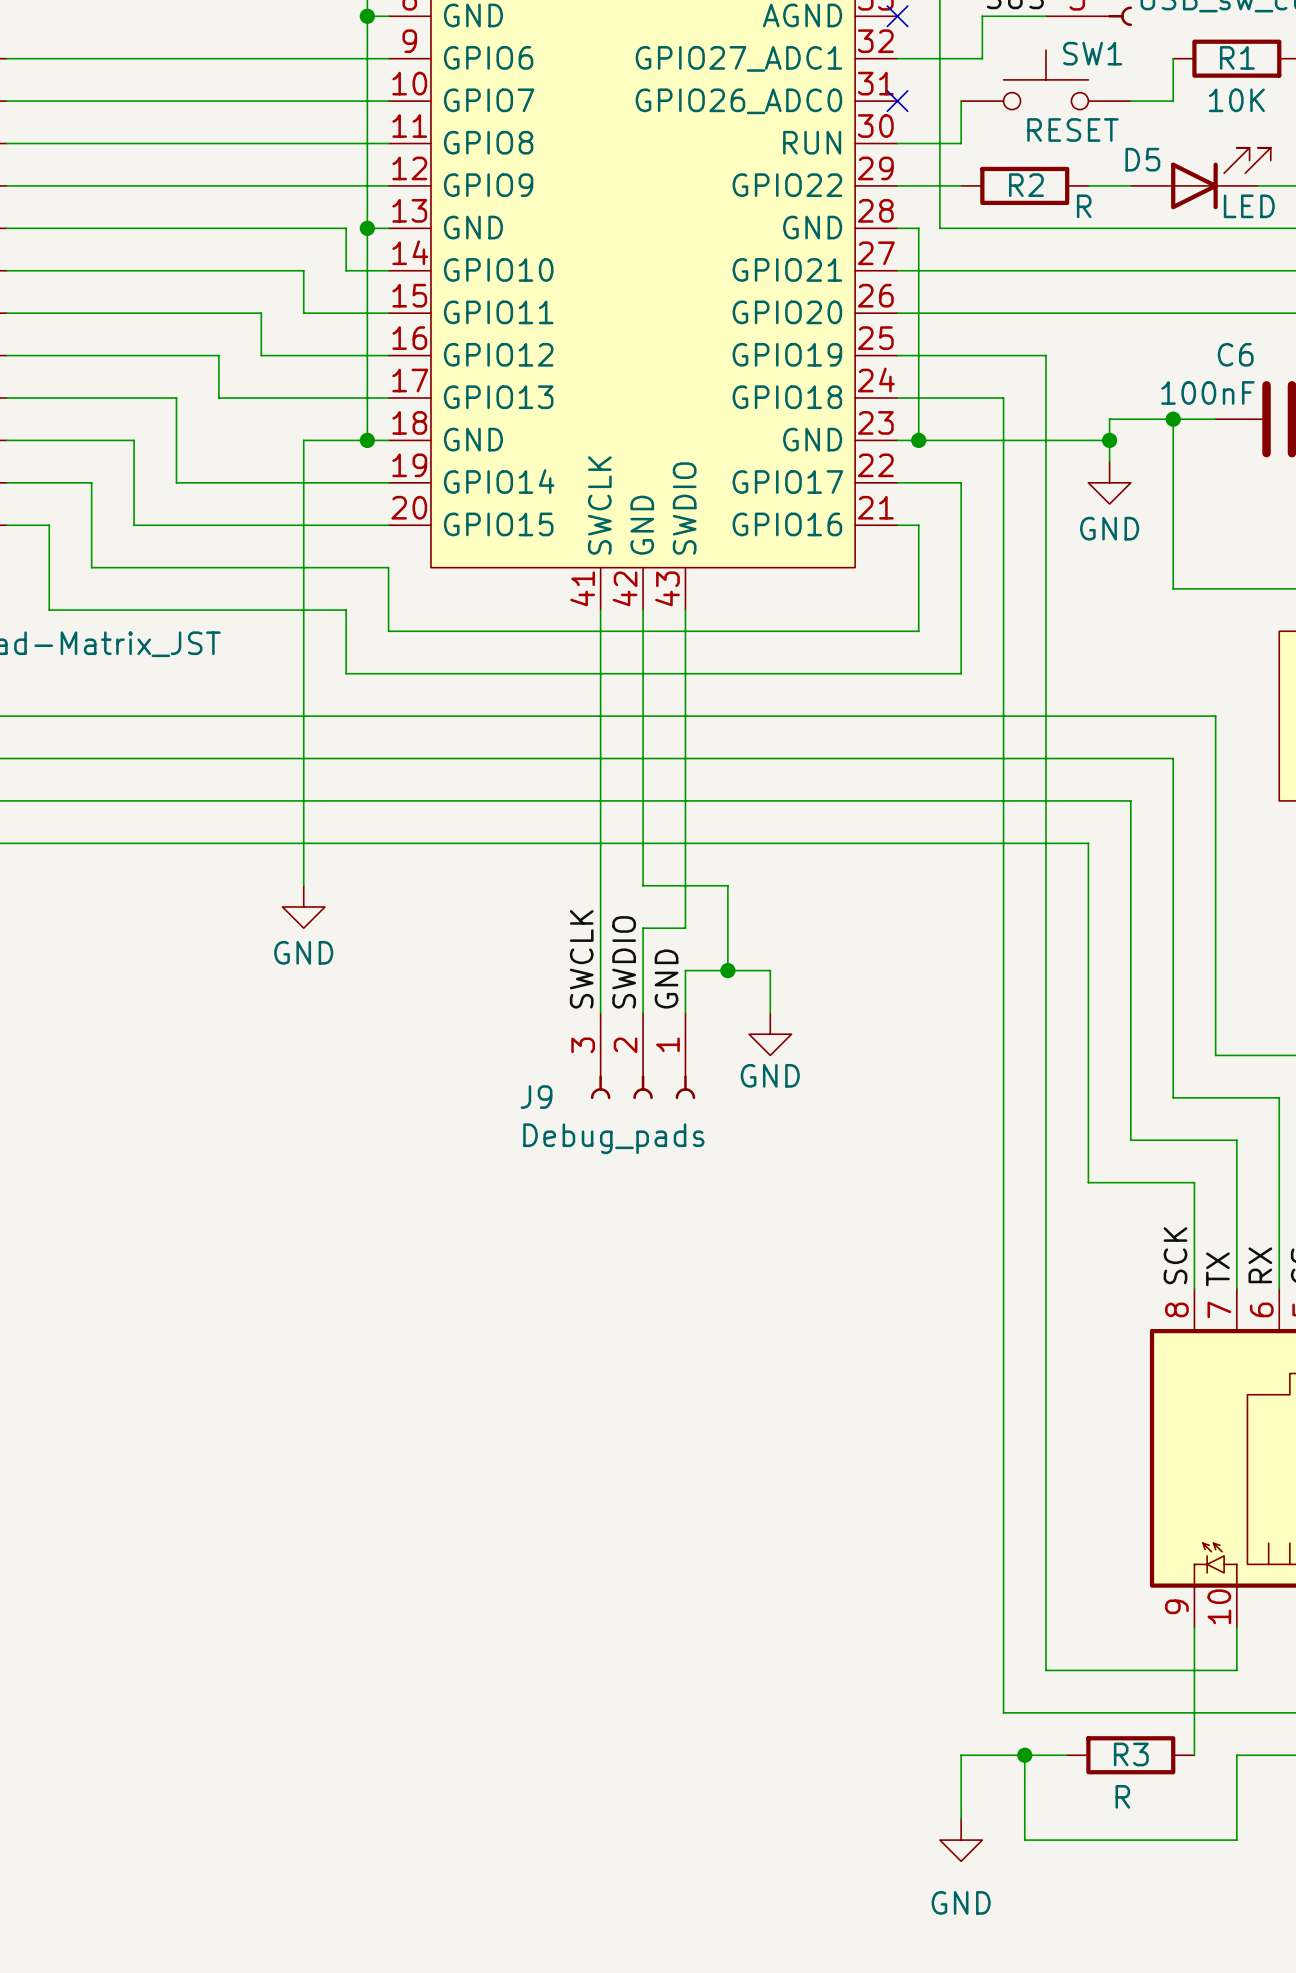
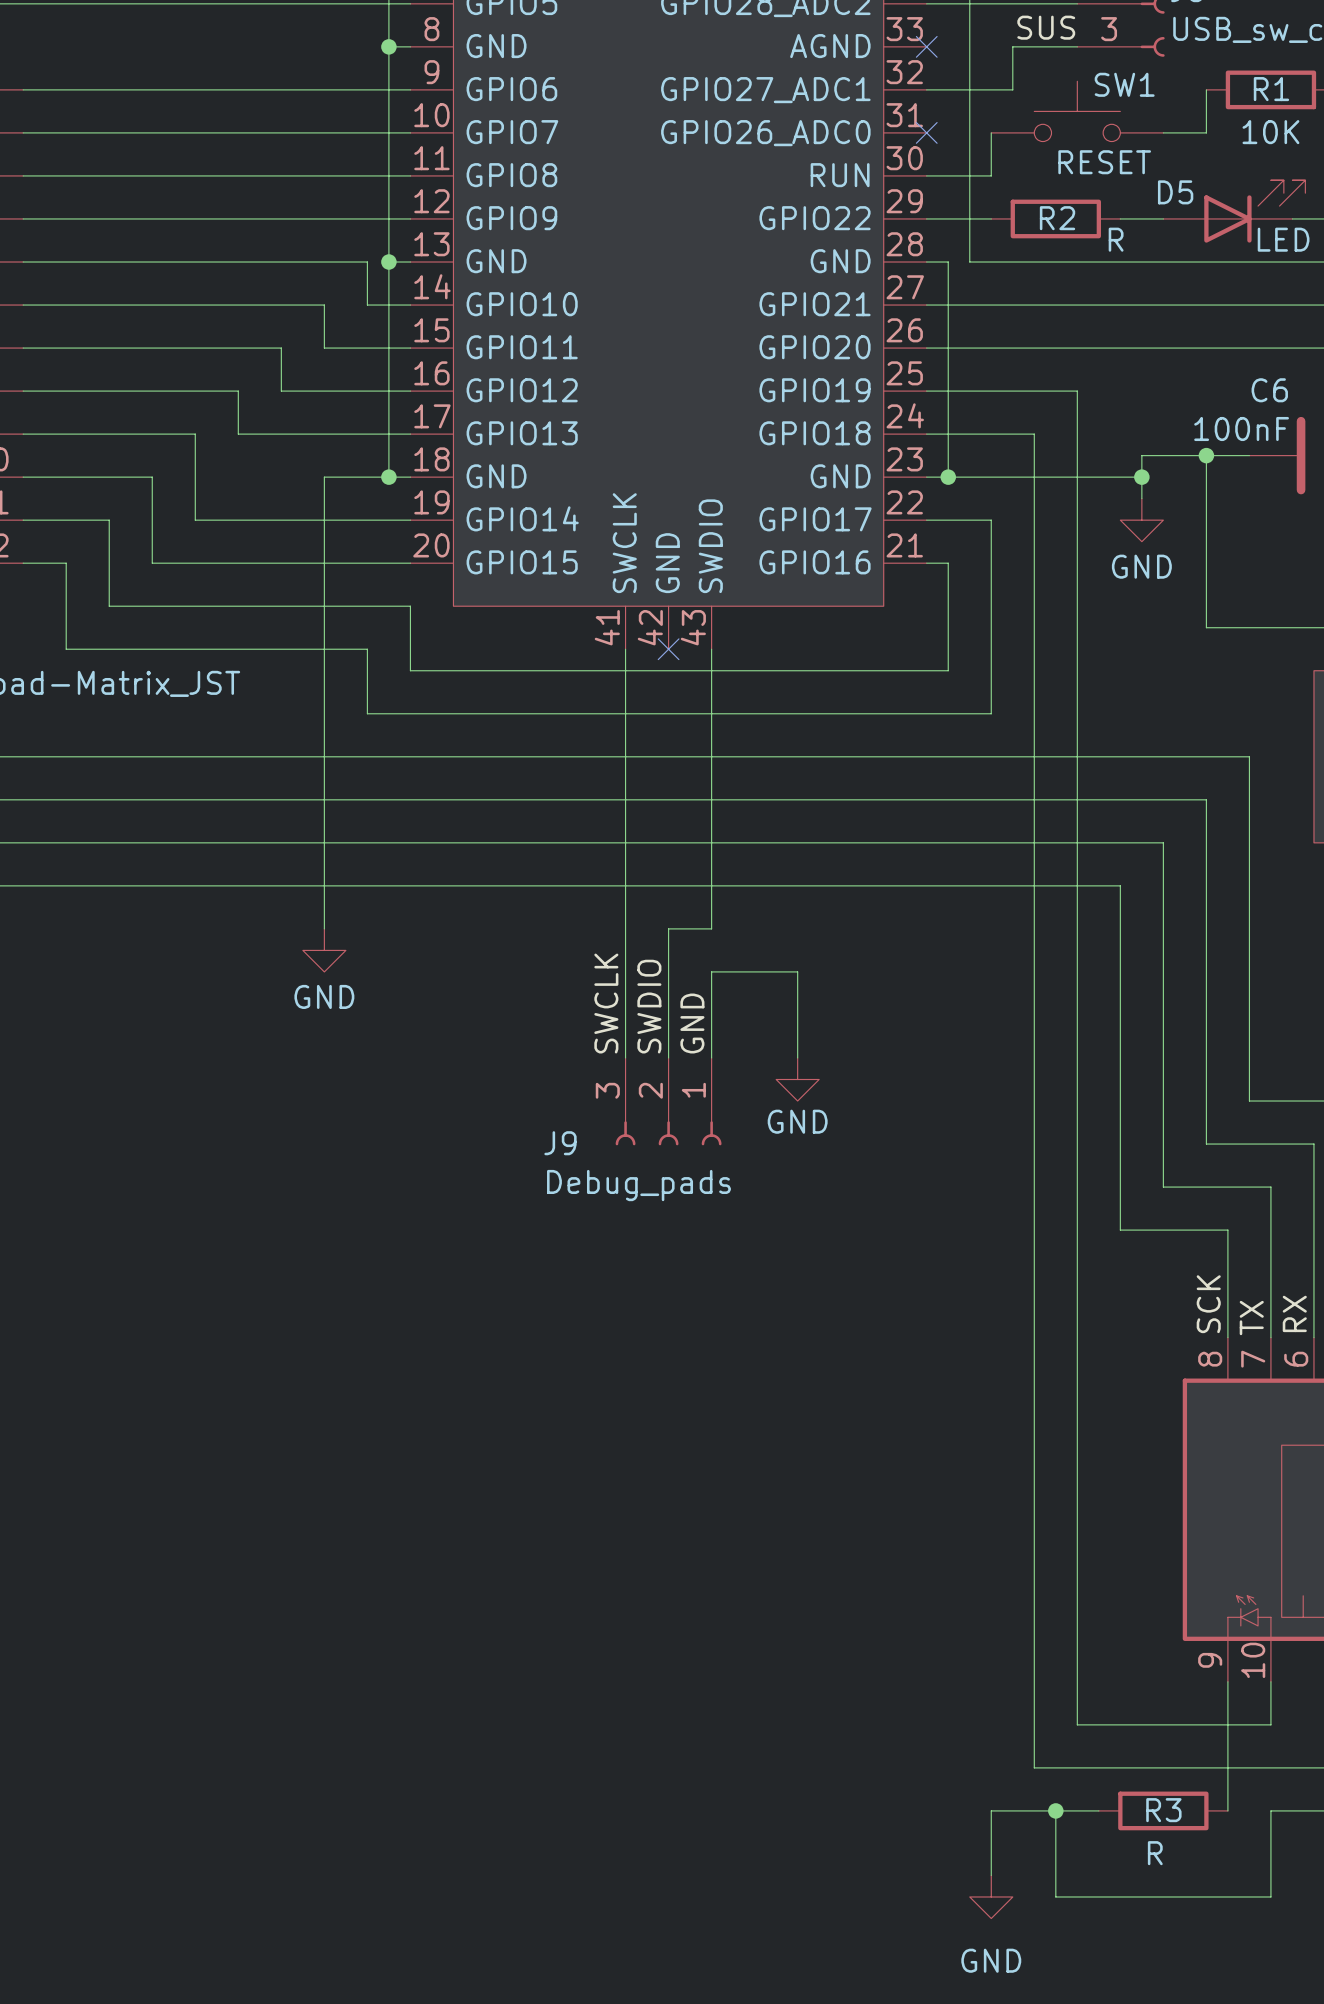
wire: (643, 610) (643, 885) -> none
no-connect mark: none -> (668, 649)
wire: (643, 928) (685, 928) (685, 885) (727, 885) (727, 970) -> (668, 971) (668, 928)
wire: (685, 970) (770, 970) -> (711, 1014) (711, 971) (797, 971) (797, 1014)
junction: (727, 970) -> none

